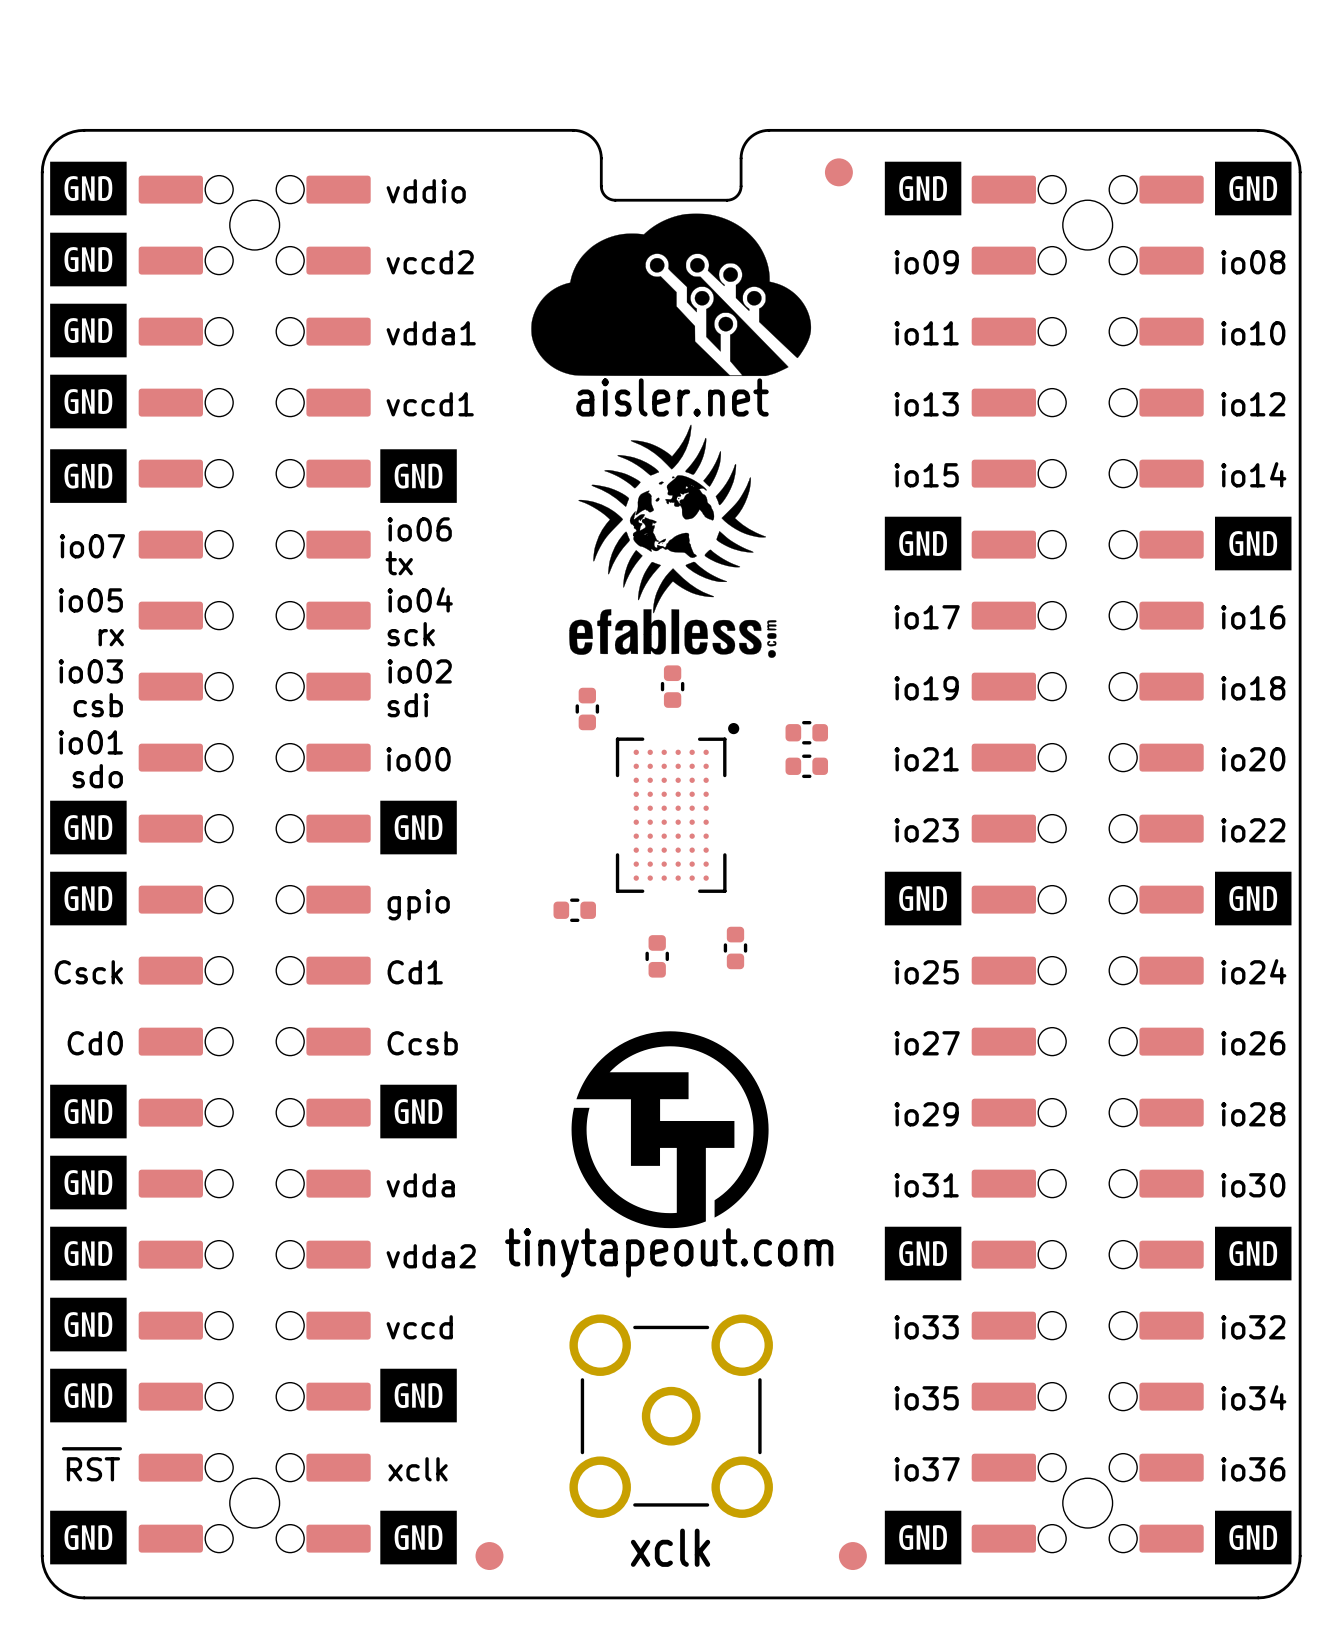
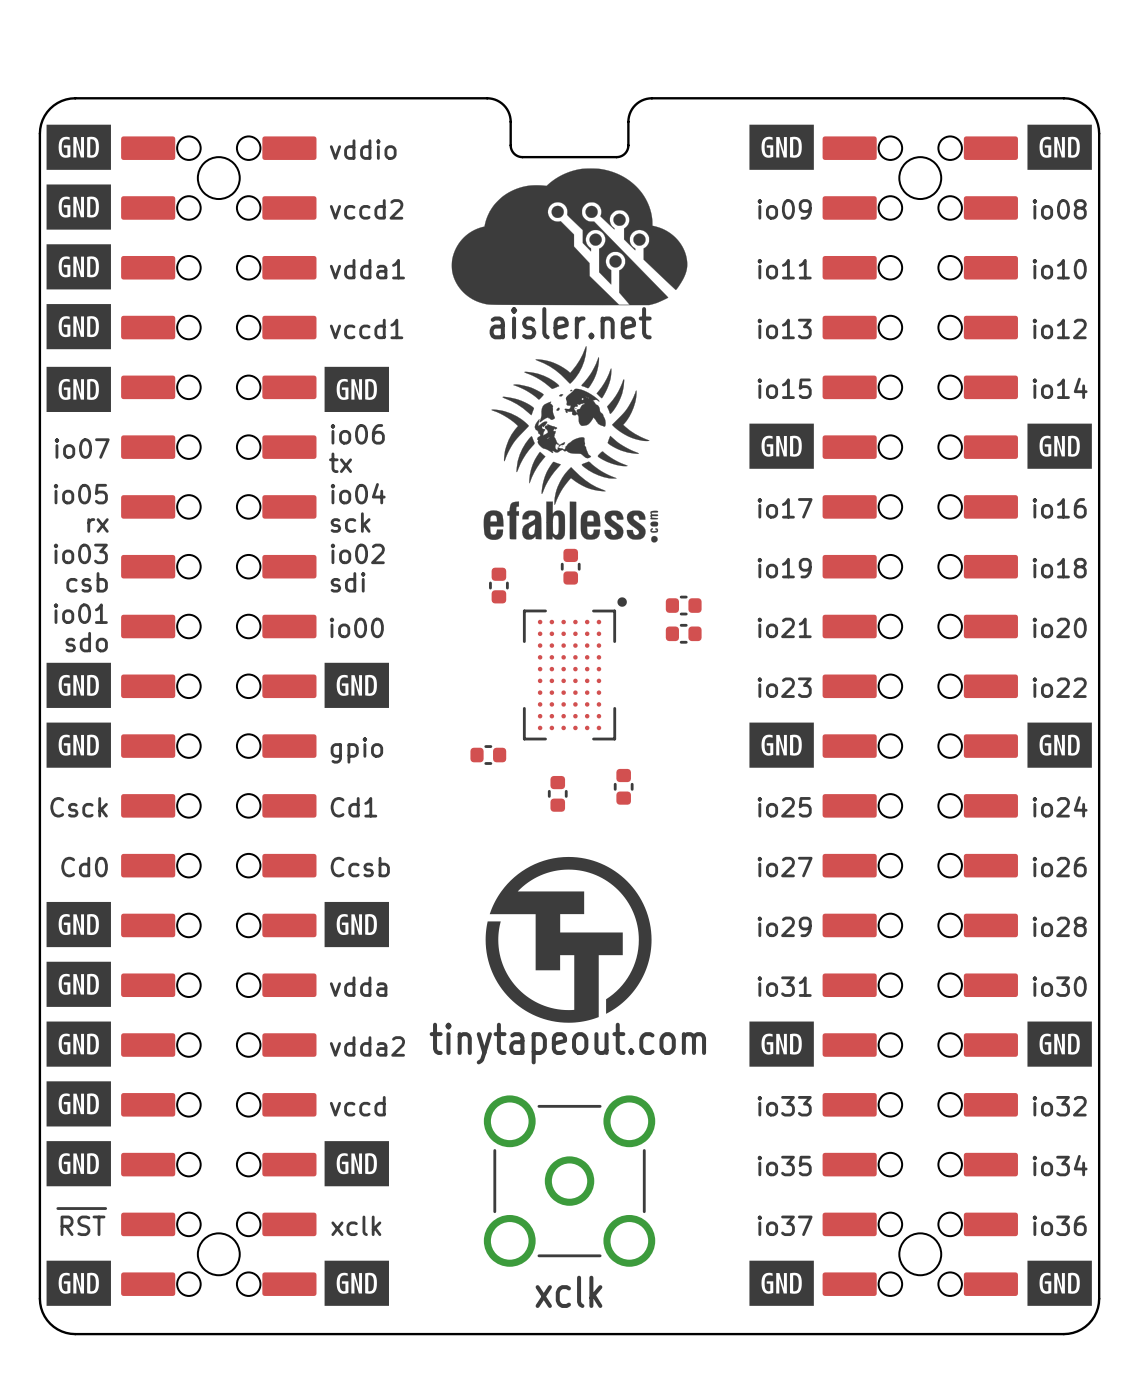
part: (838, 172) -> none
part: (489, 1556) -> none
part: (852, 1556) -> none

